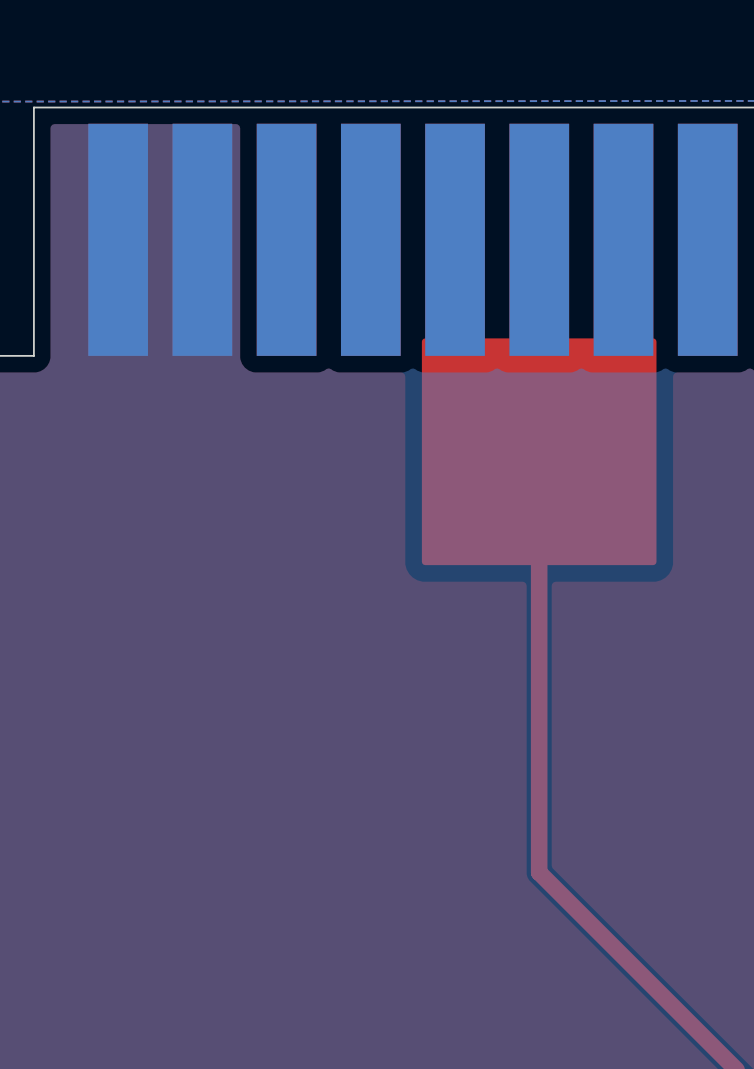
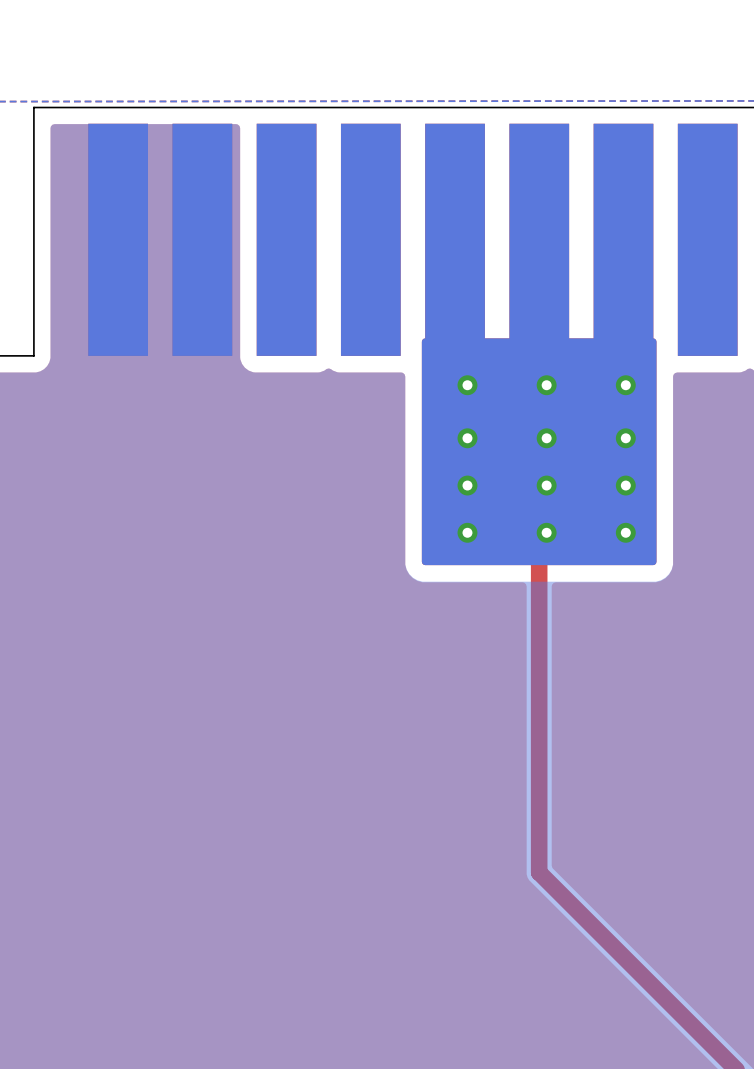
drawing: none -> [421, 338, 657, 566]
via: none -> (467, 385)
via: none -> (546, 385)
via: none -> (625, 385)
via: none -> (467, 438)
via: none -> (546, 438)
via: none -> (625, 438)
via: none -> (467, 485)
via: none -> (546, 485)
via: none -> (625, 485)
via: none -> (467, 532)
via: none -> (546, 532)
via: none -> (625, 532)

